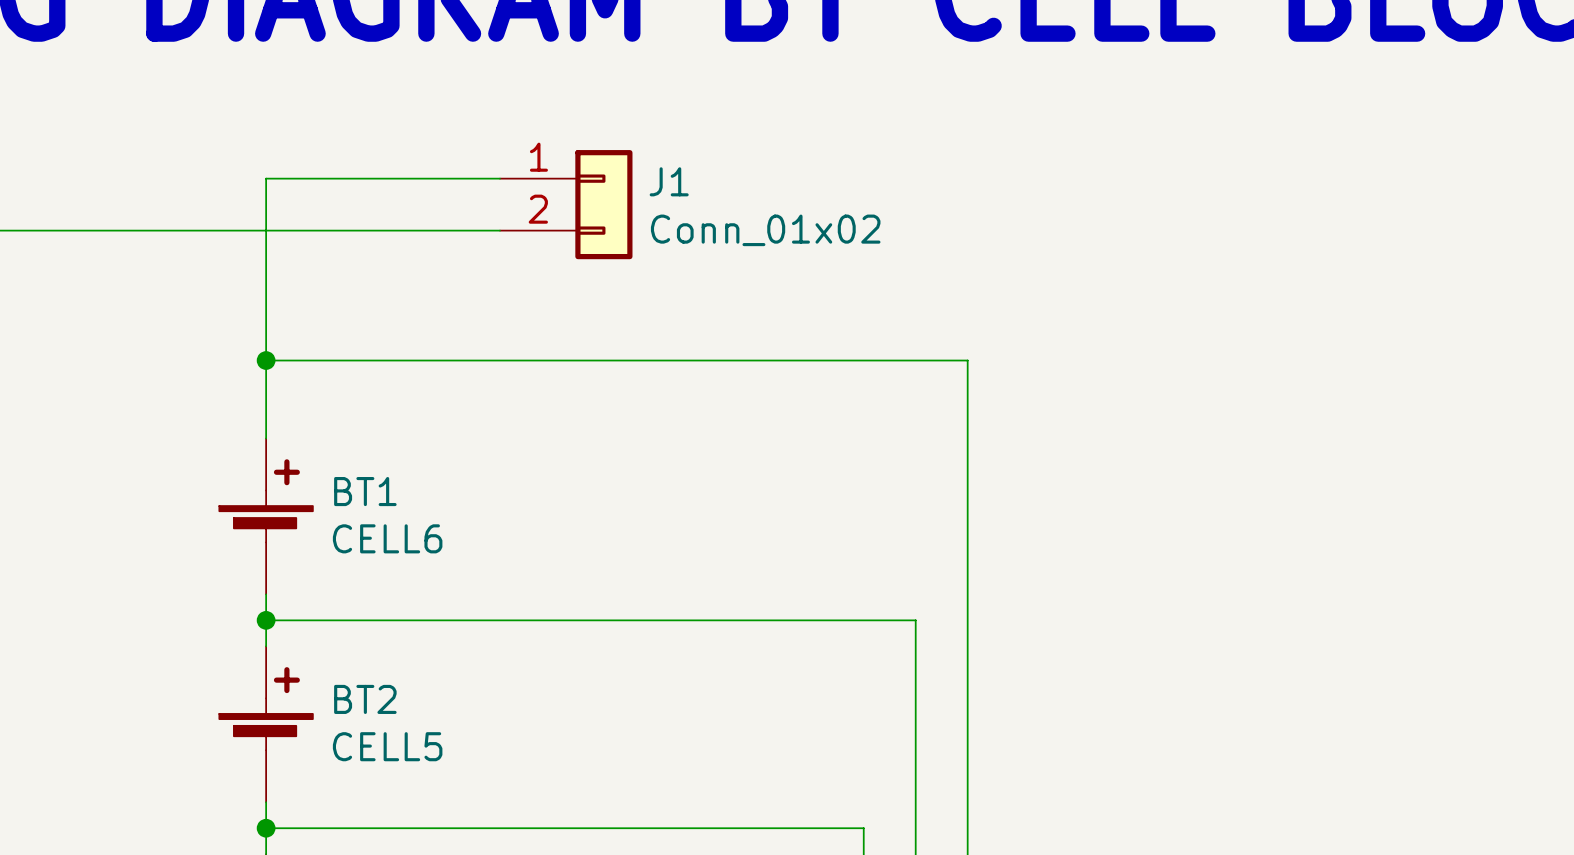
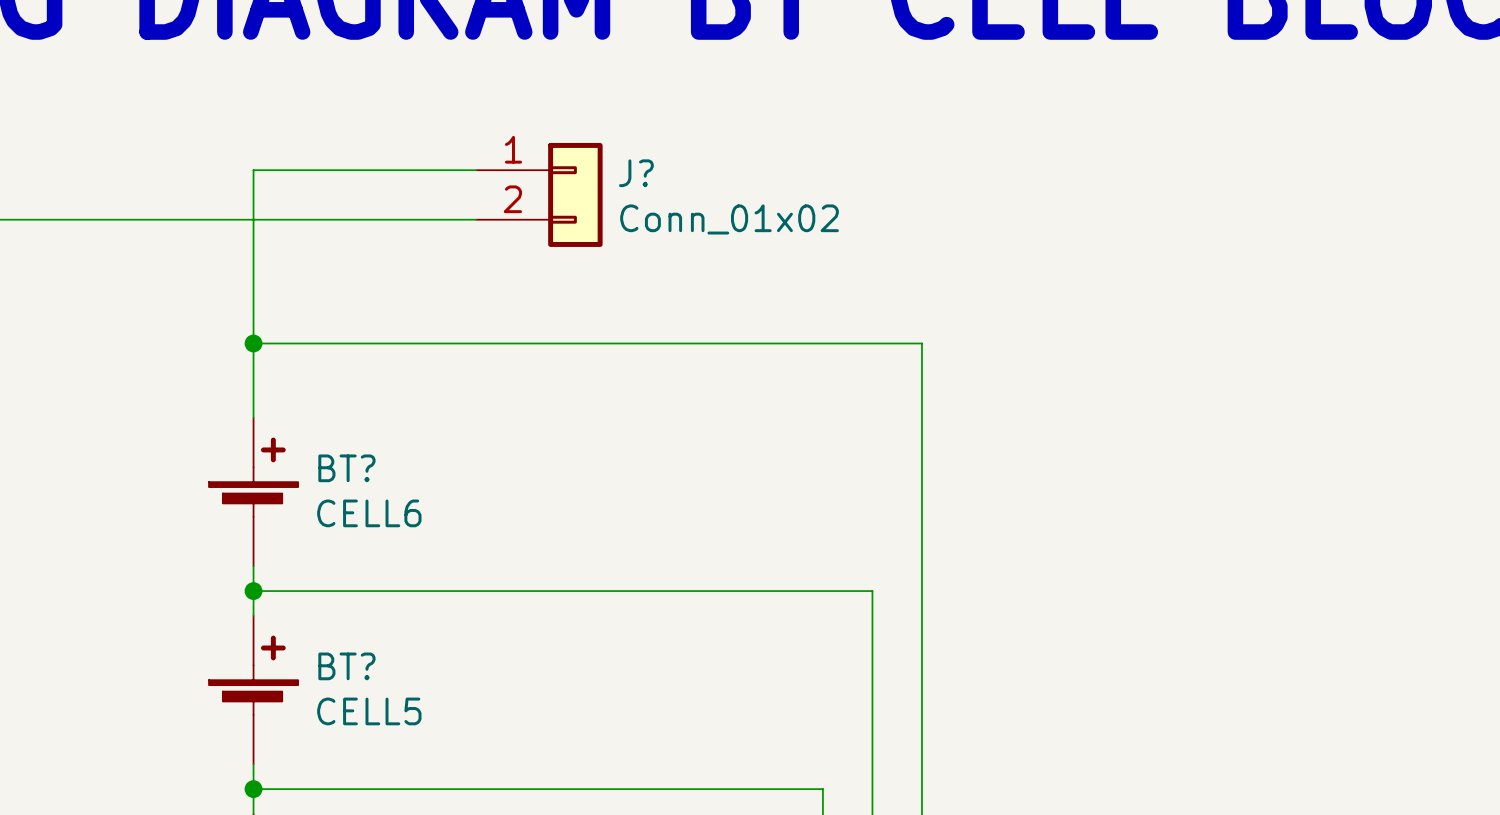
J1 name: J1 (669, 181) -> J? (636, 173)
BT1 name: BT1 (365, 491) -> BT? (346, 468)
BT2 name: BT2 (365, 699) -> BT? (346, 666)

